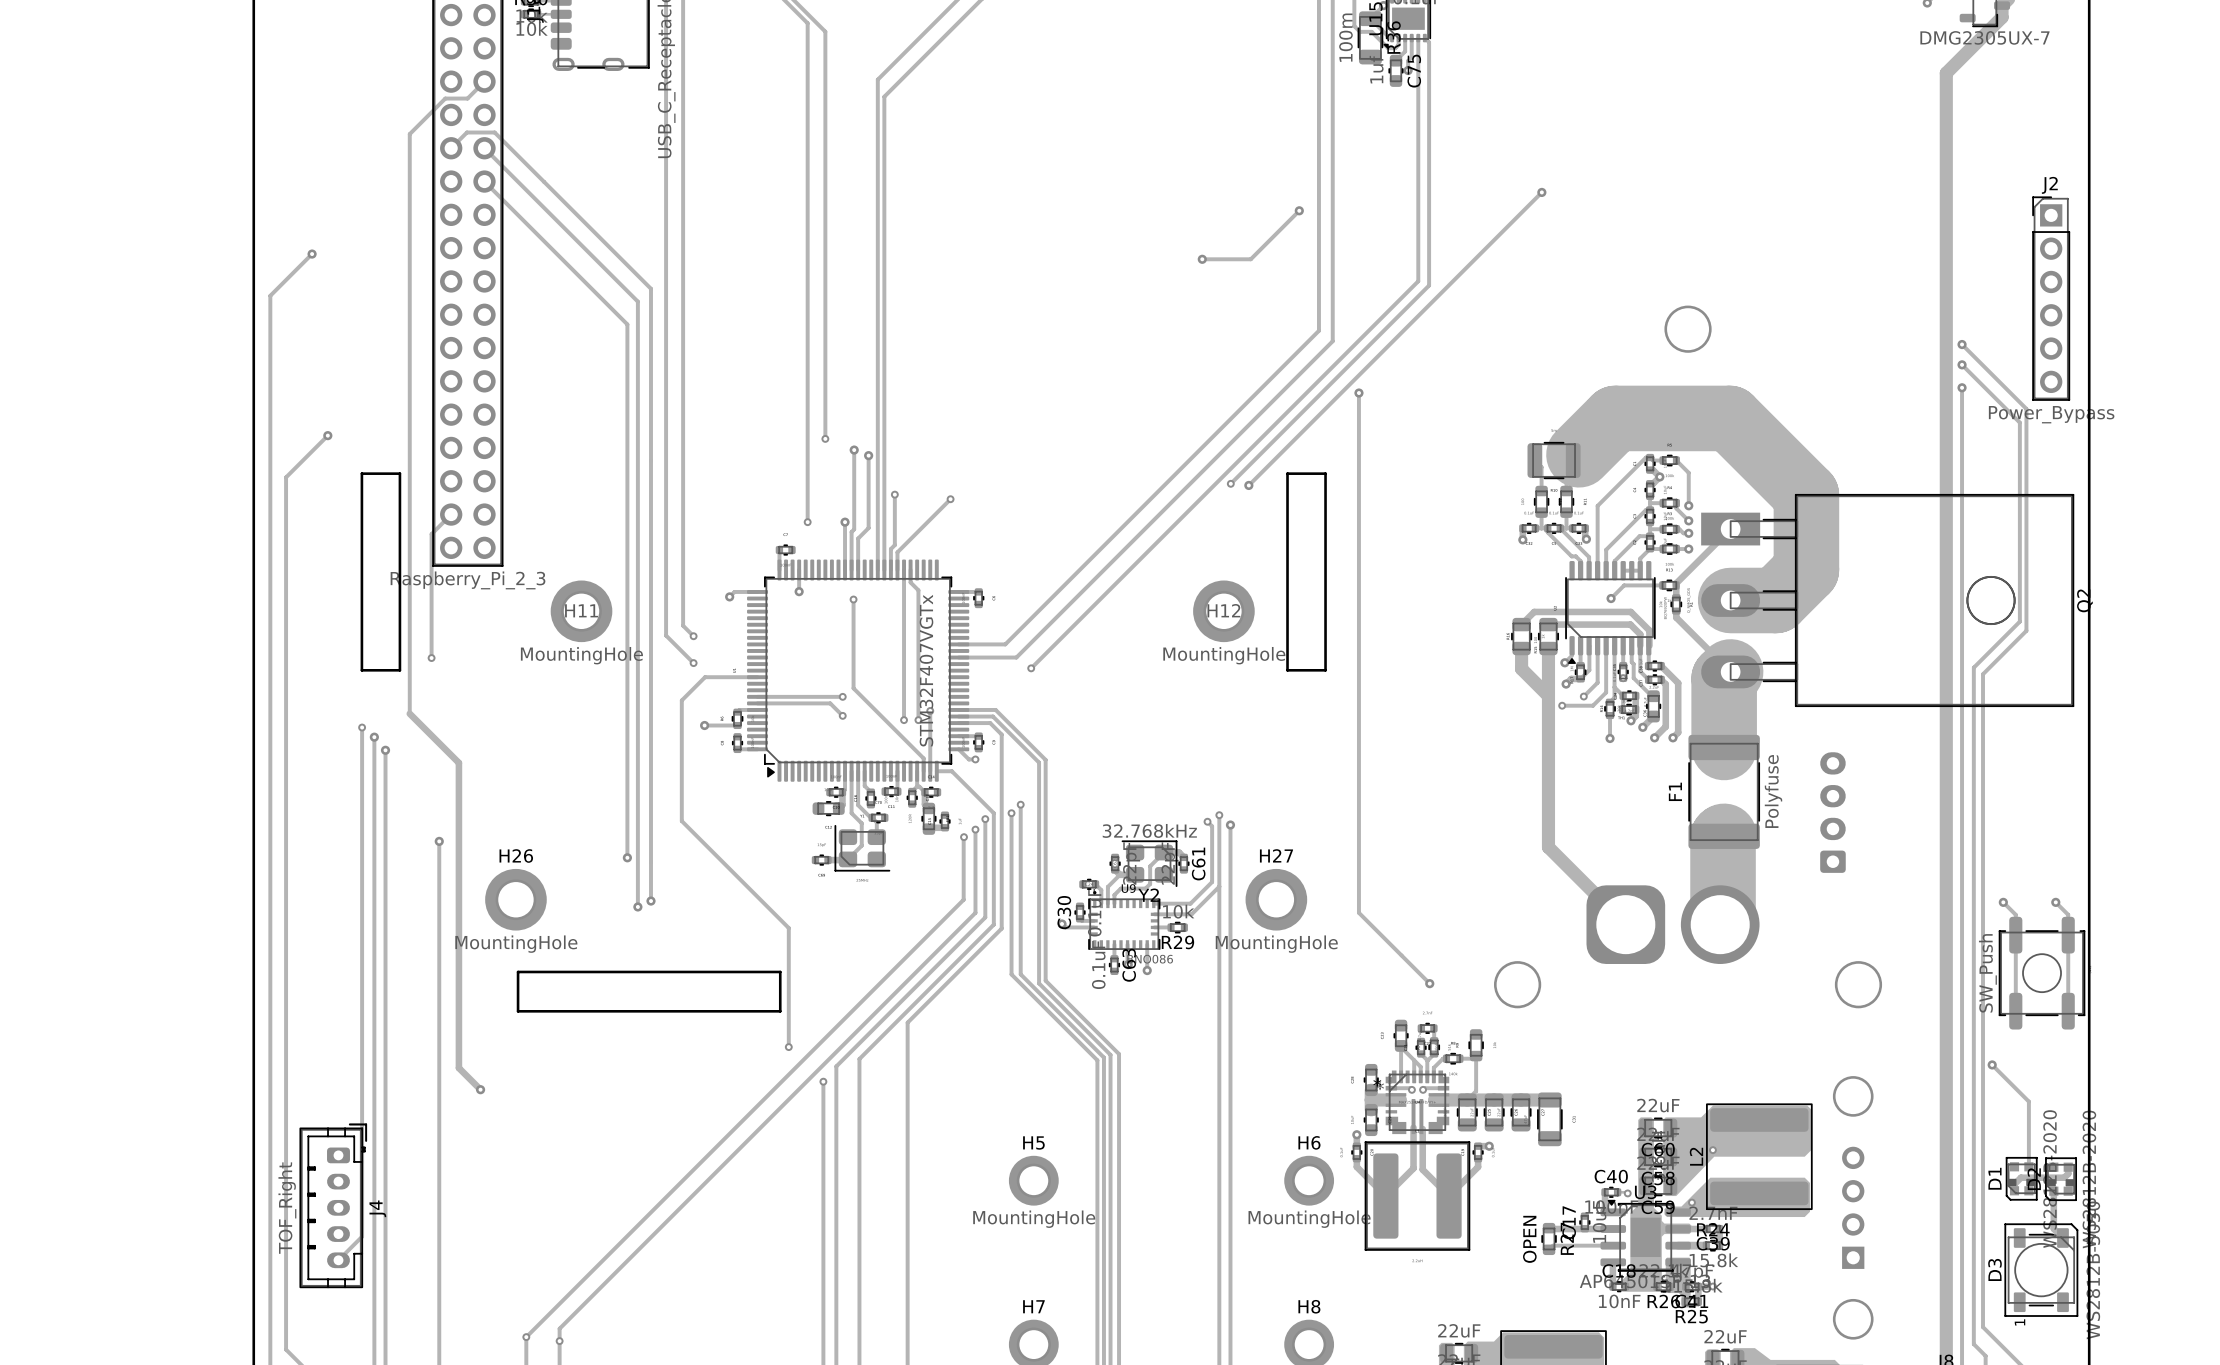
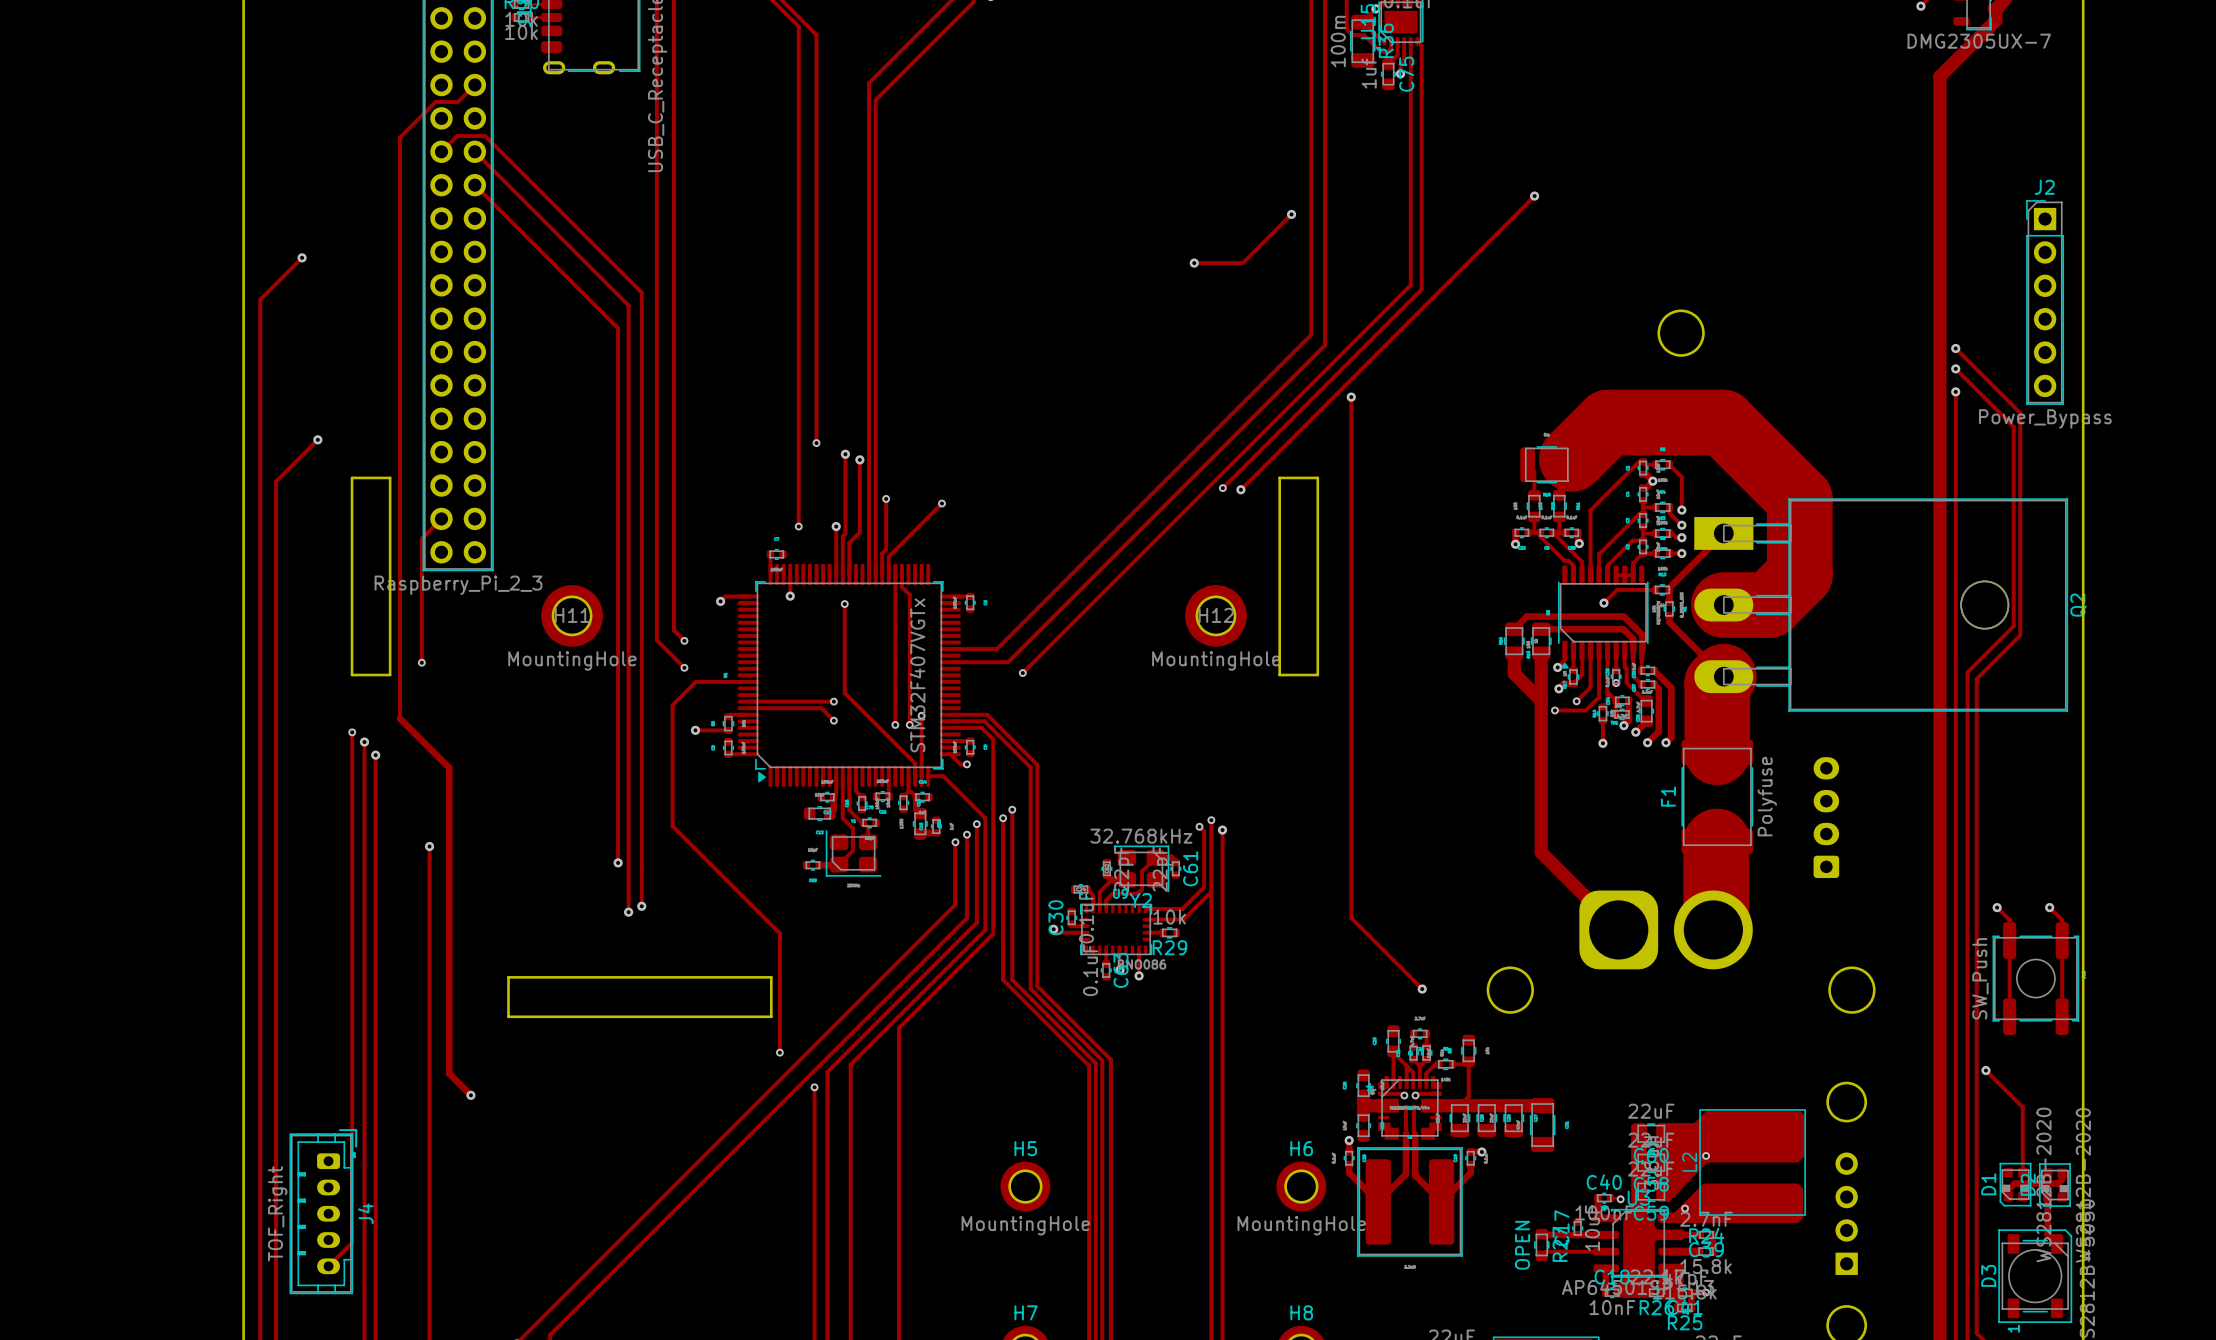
H26: MountingHole (515, 899) -> none
H27: MountingHole (1276, 899) -> none

